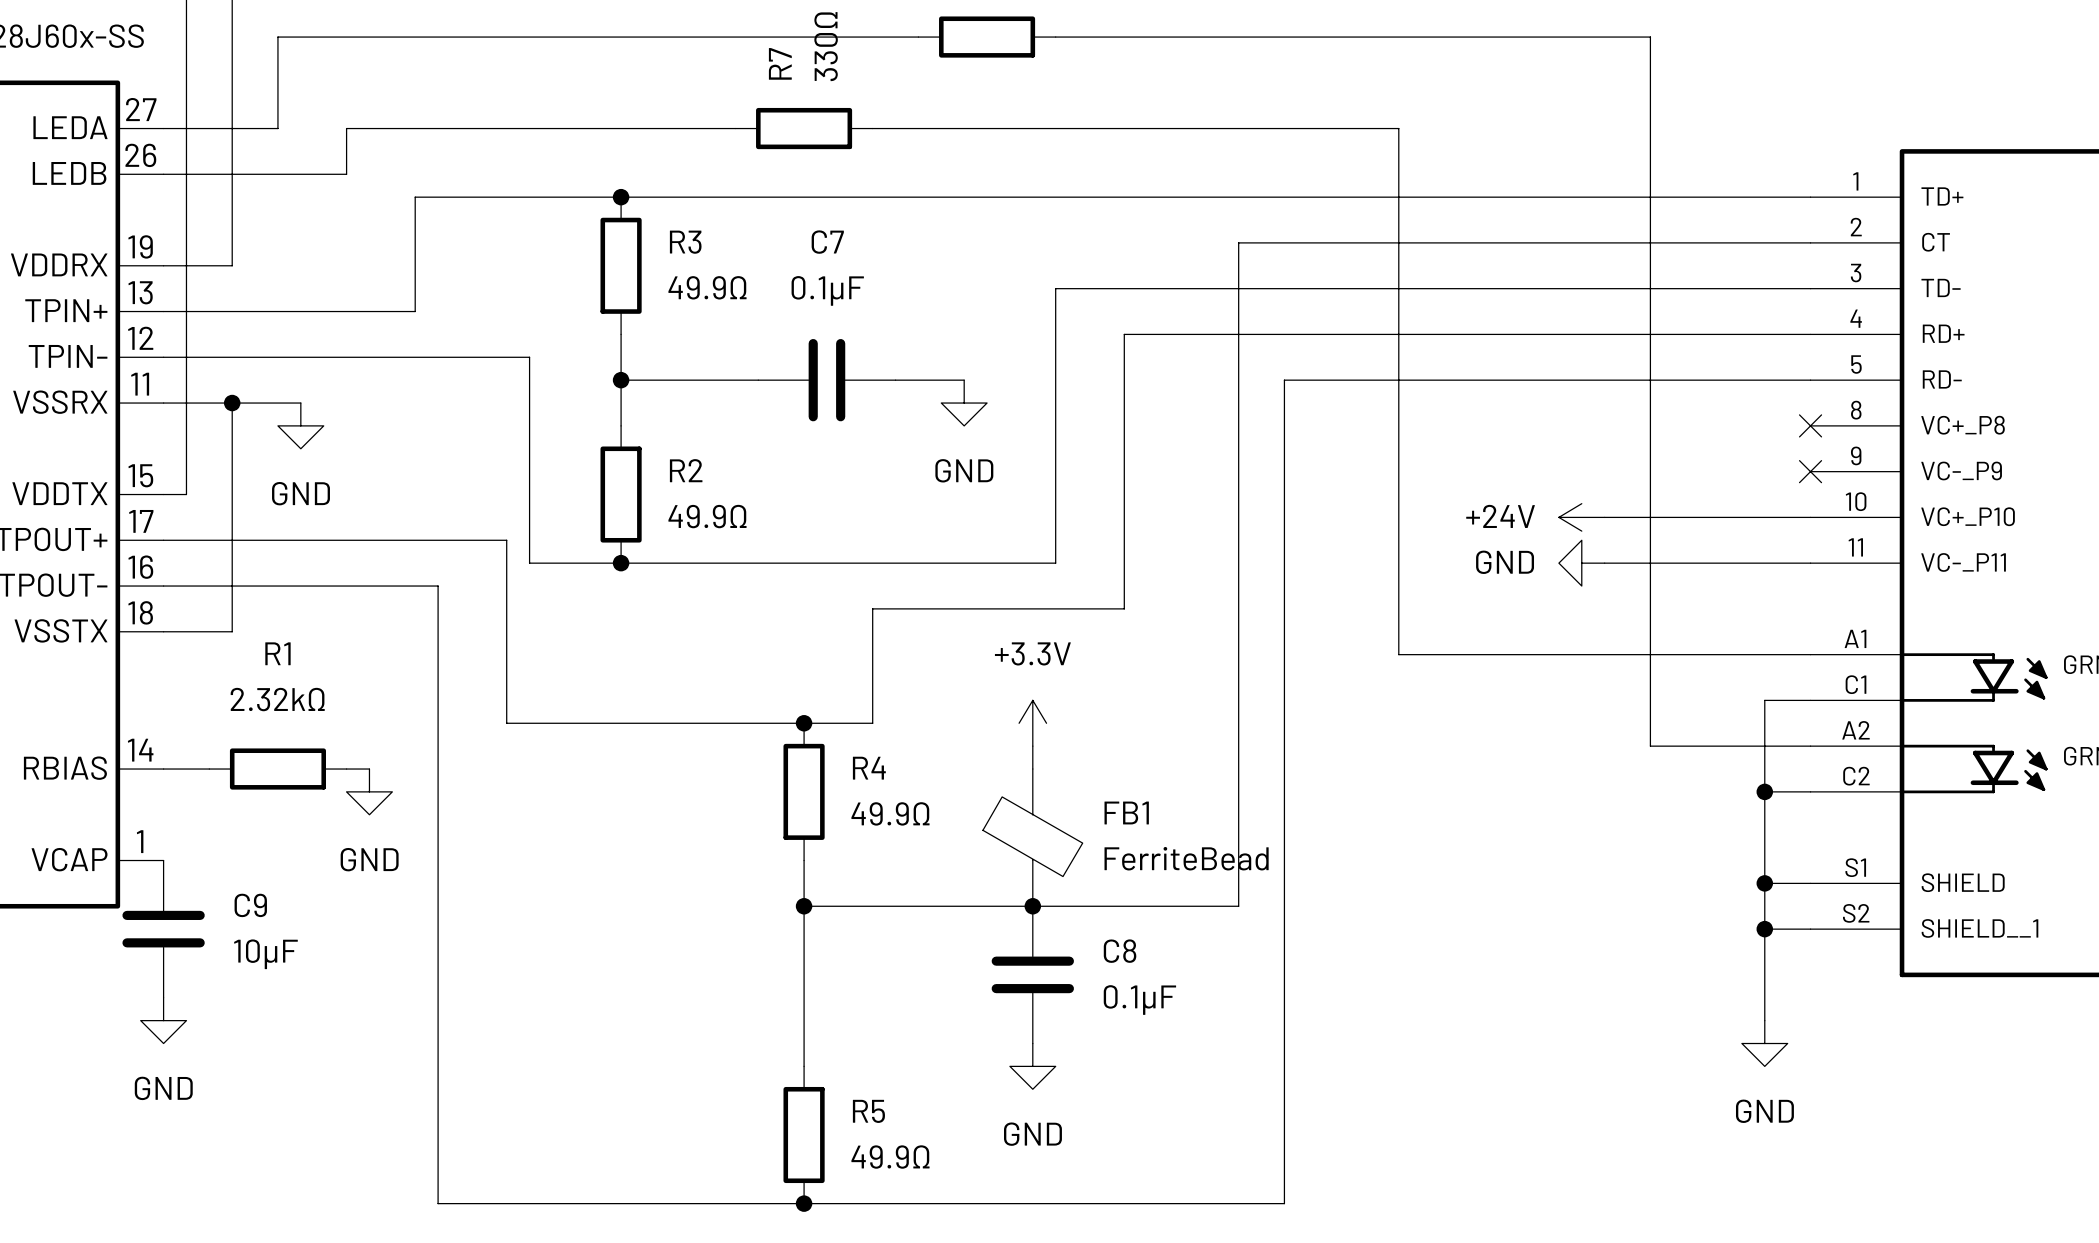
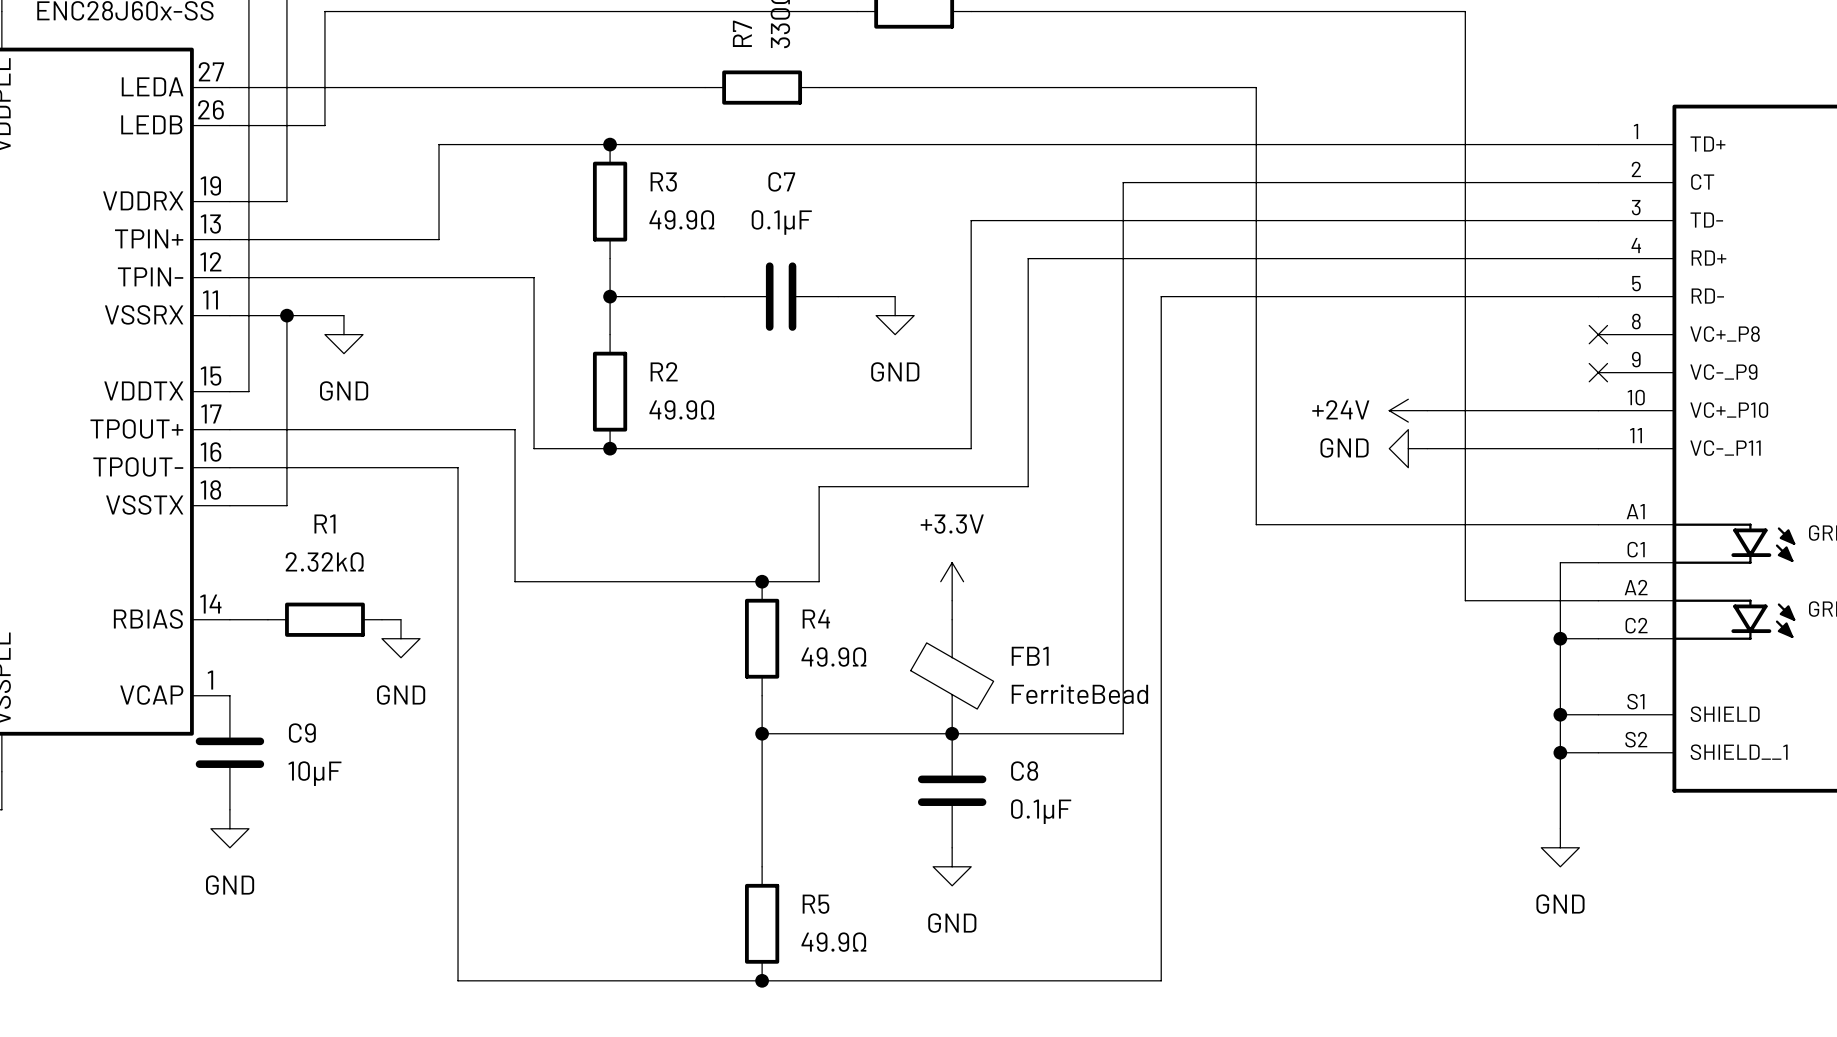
wire: (346, 128) (346, 174) (277, 174) -> (381, 87) (324, 87) (324, 125)

